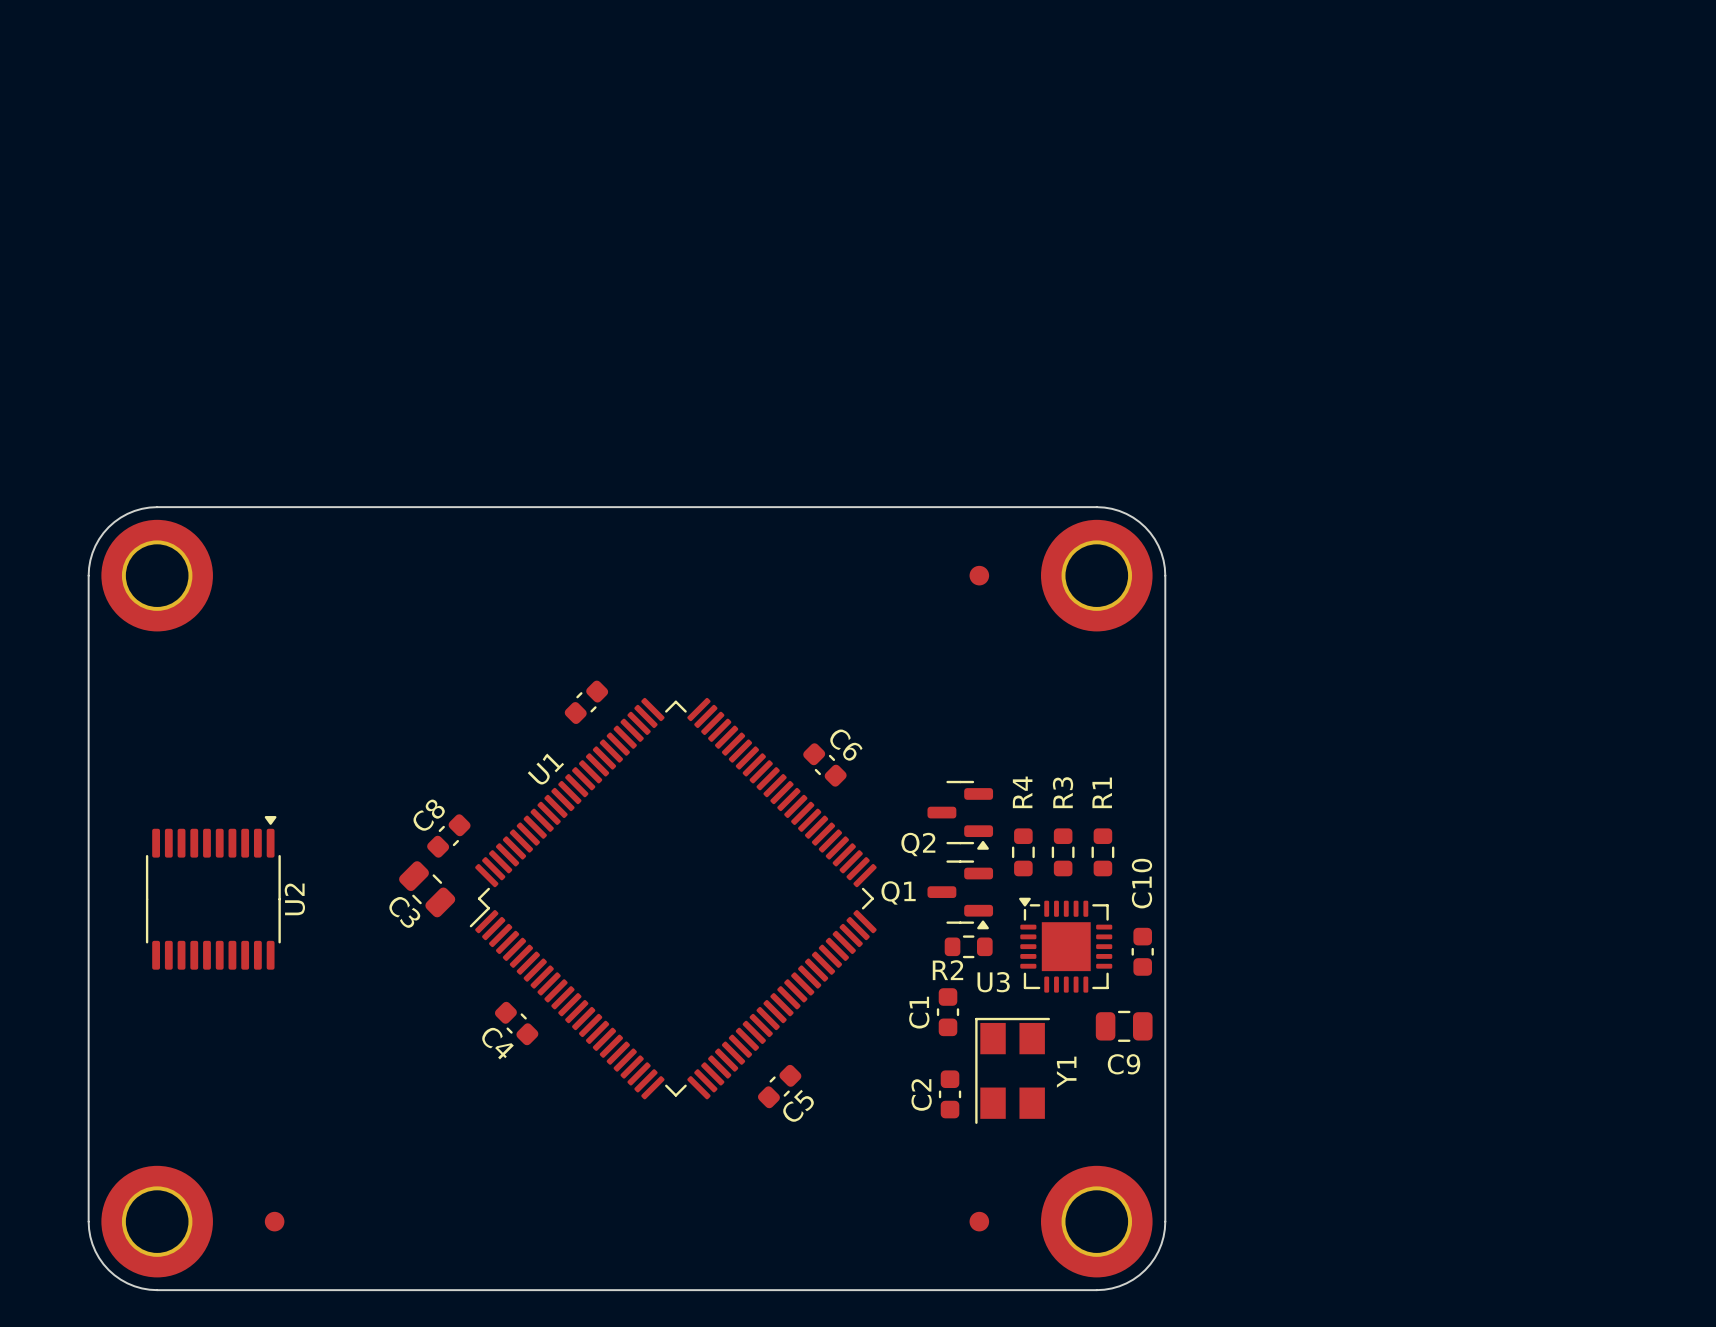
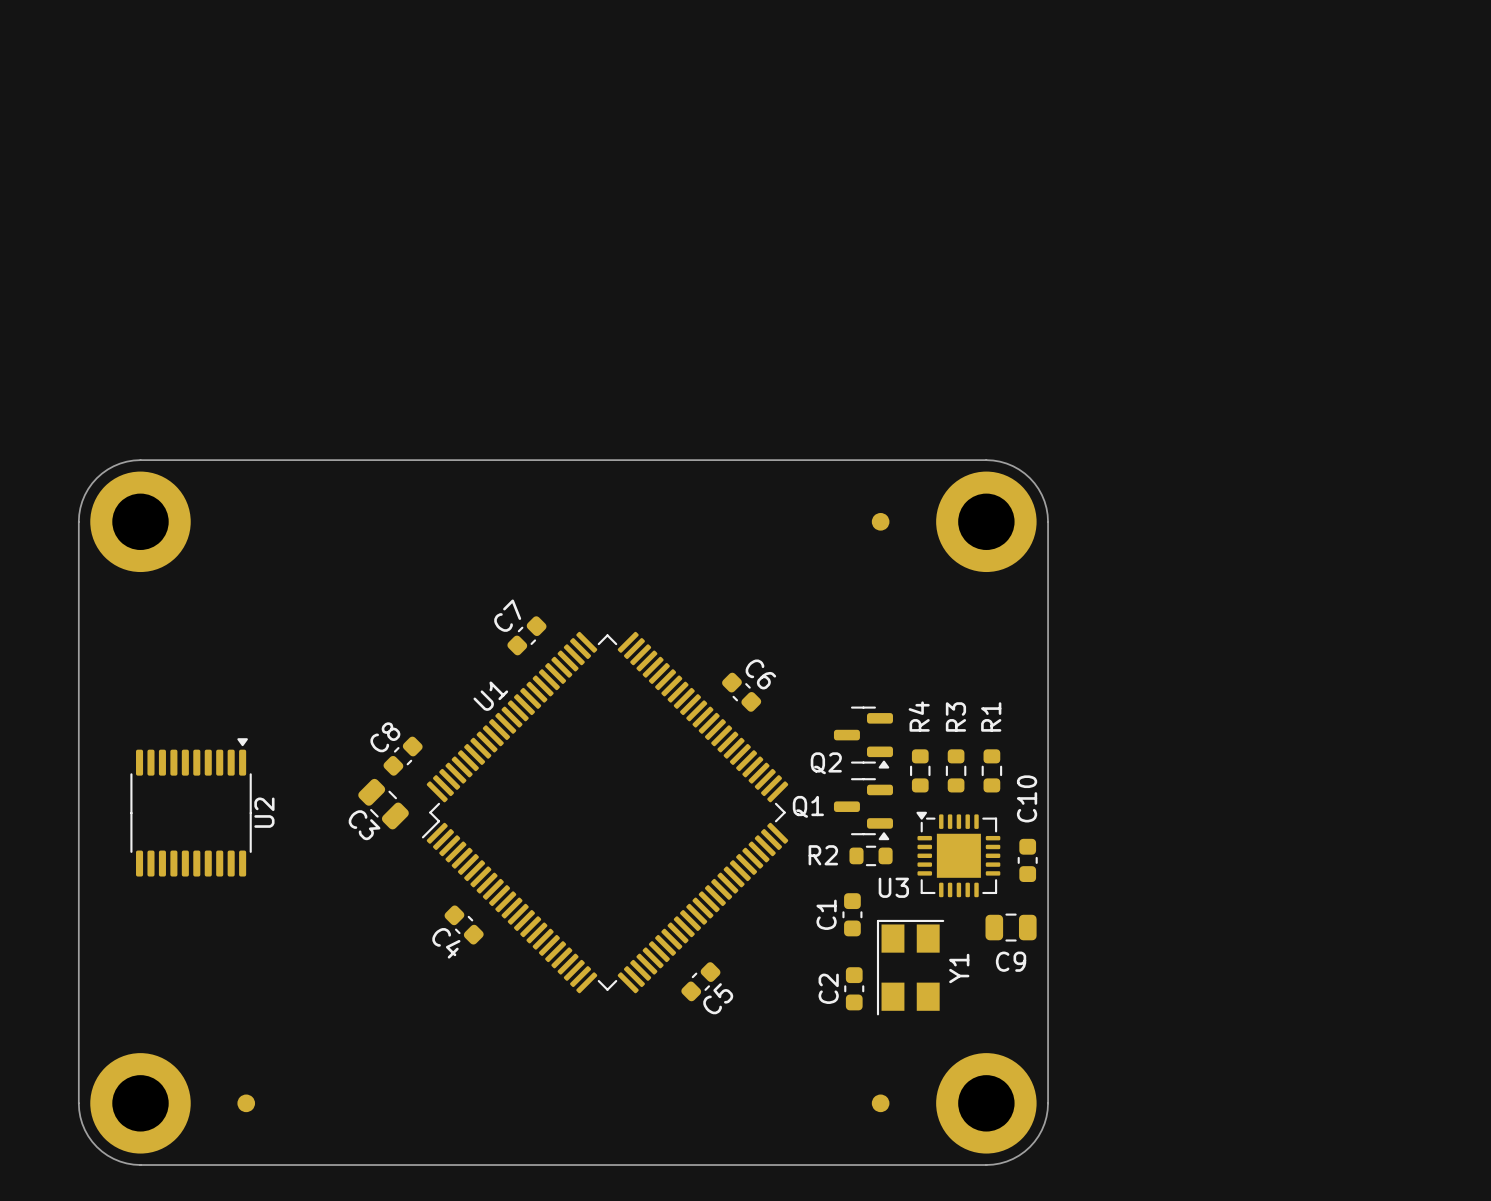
C7 name: none -> C7 (507, 615)
R2 name position: R2 (947, 970) -> R2 (823, 855)

